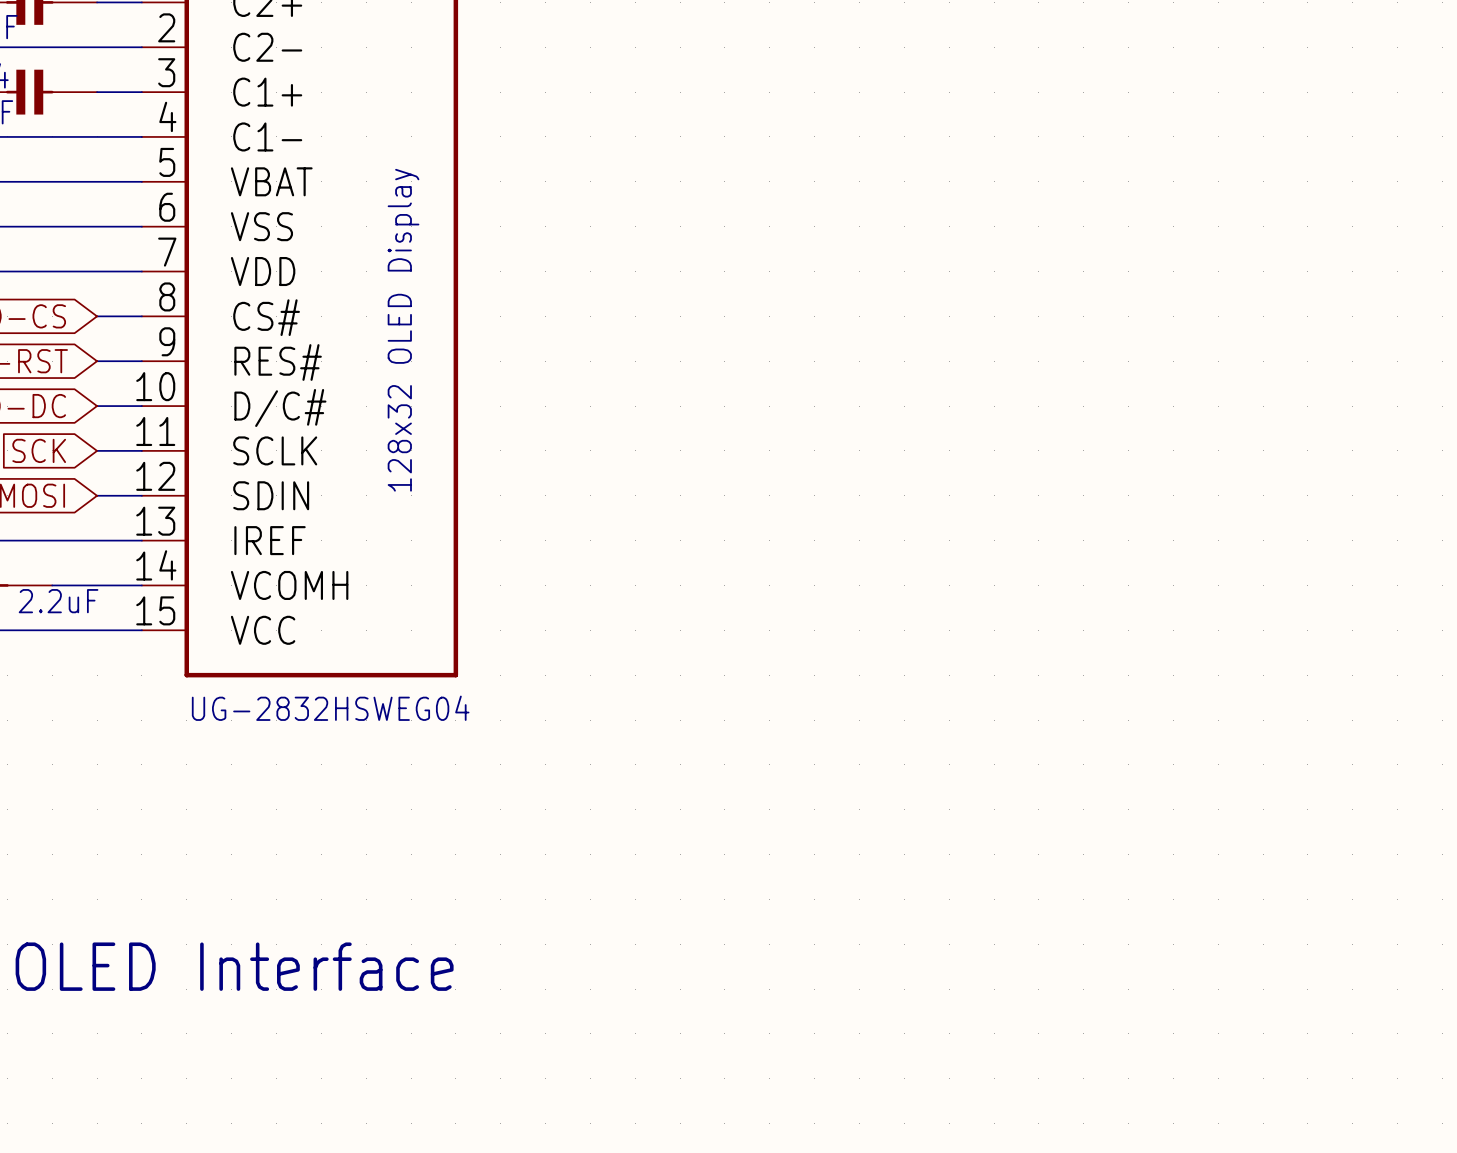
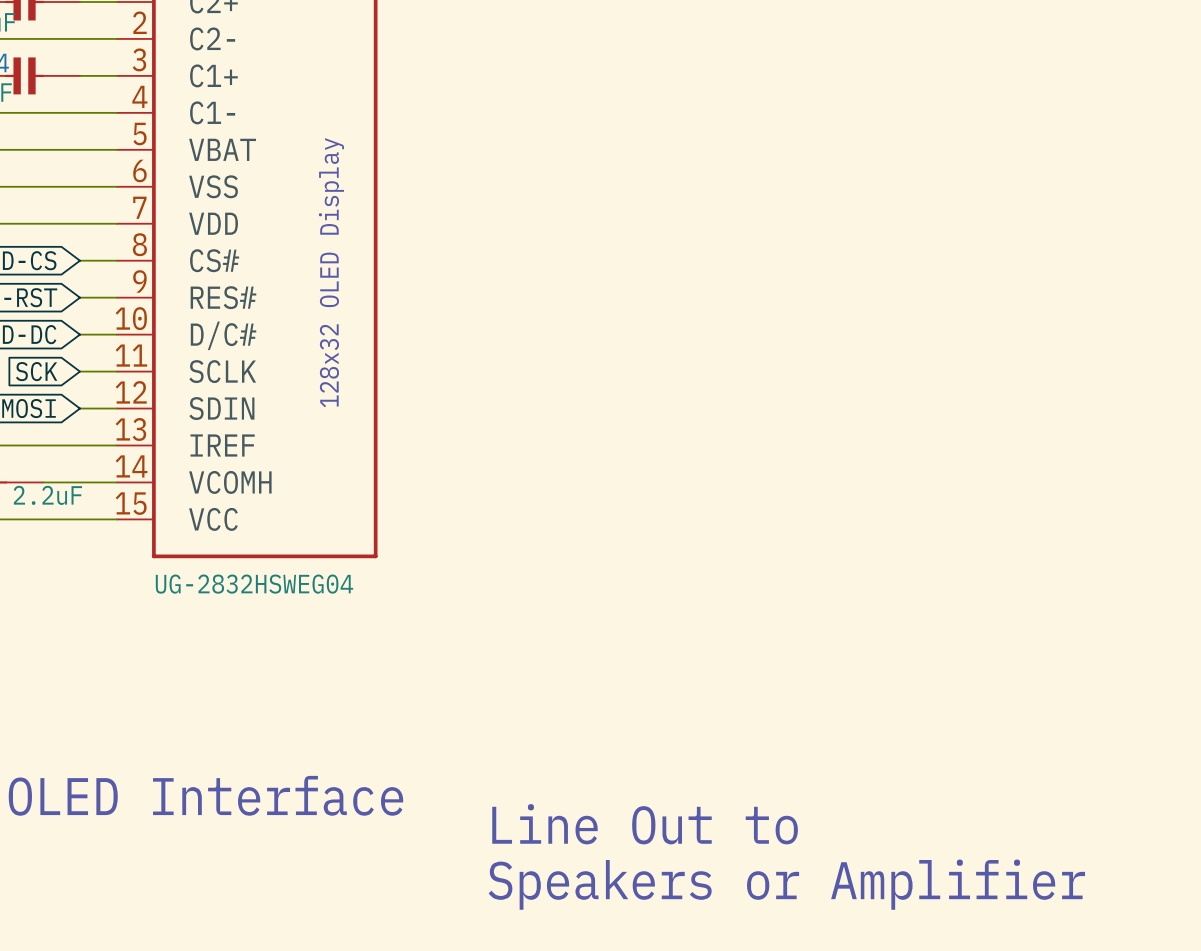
text: none -> Line Out to (645, 824)
text: none -> Speakers or Amplifier (786, 884)

